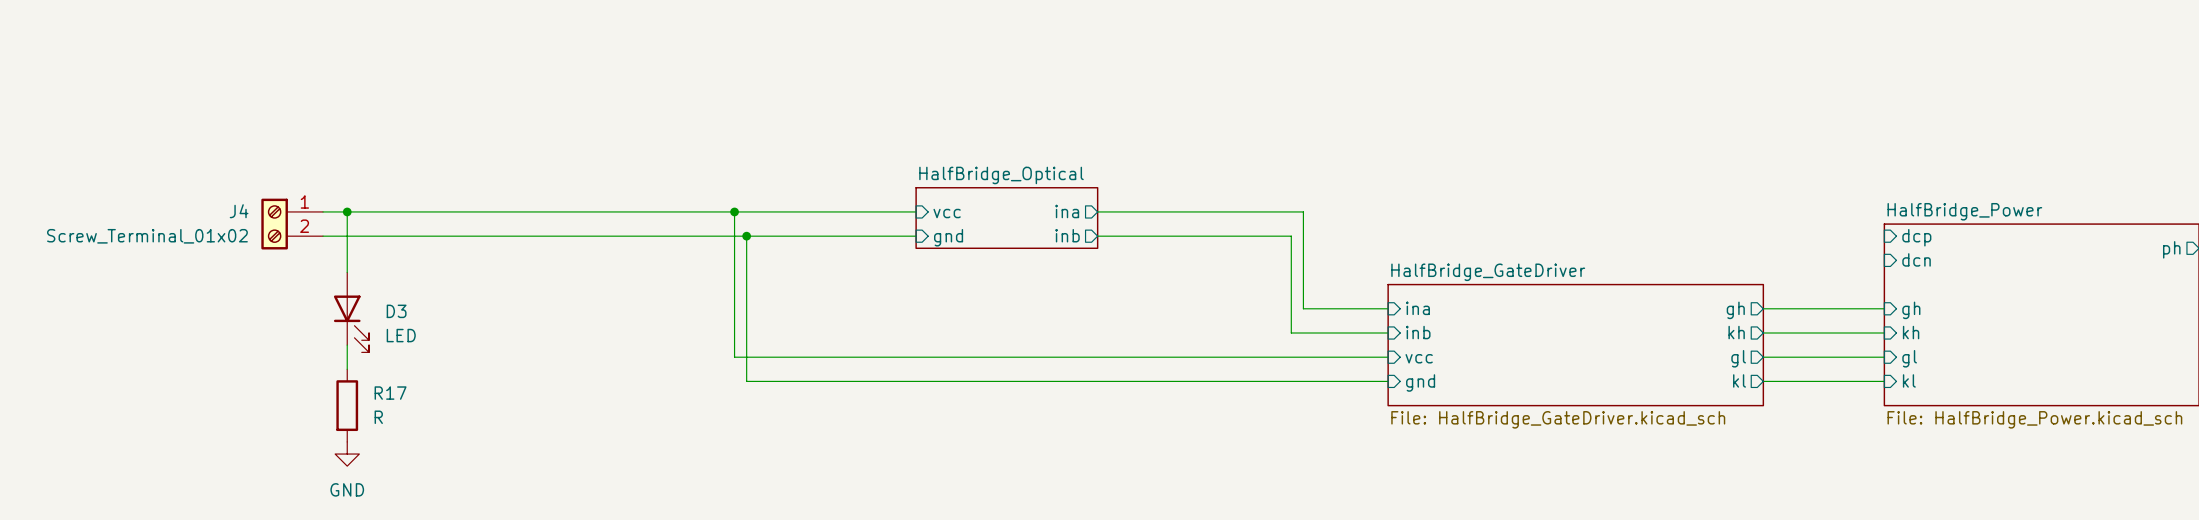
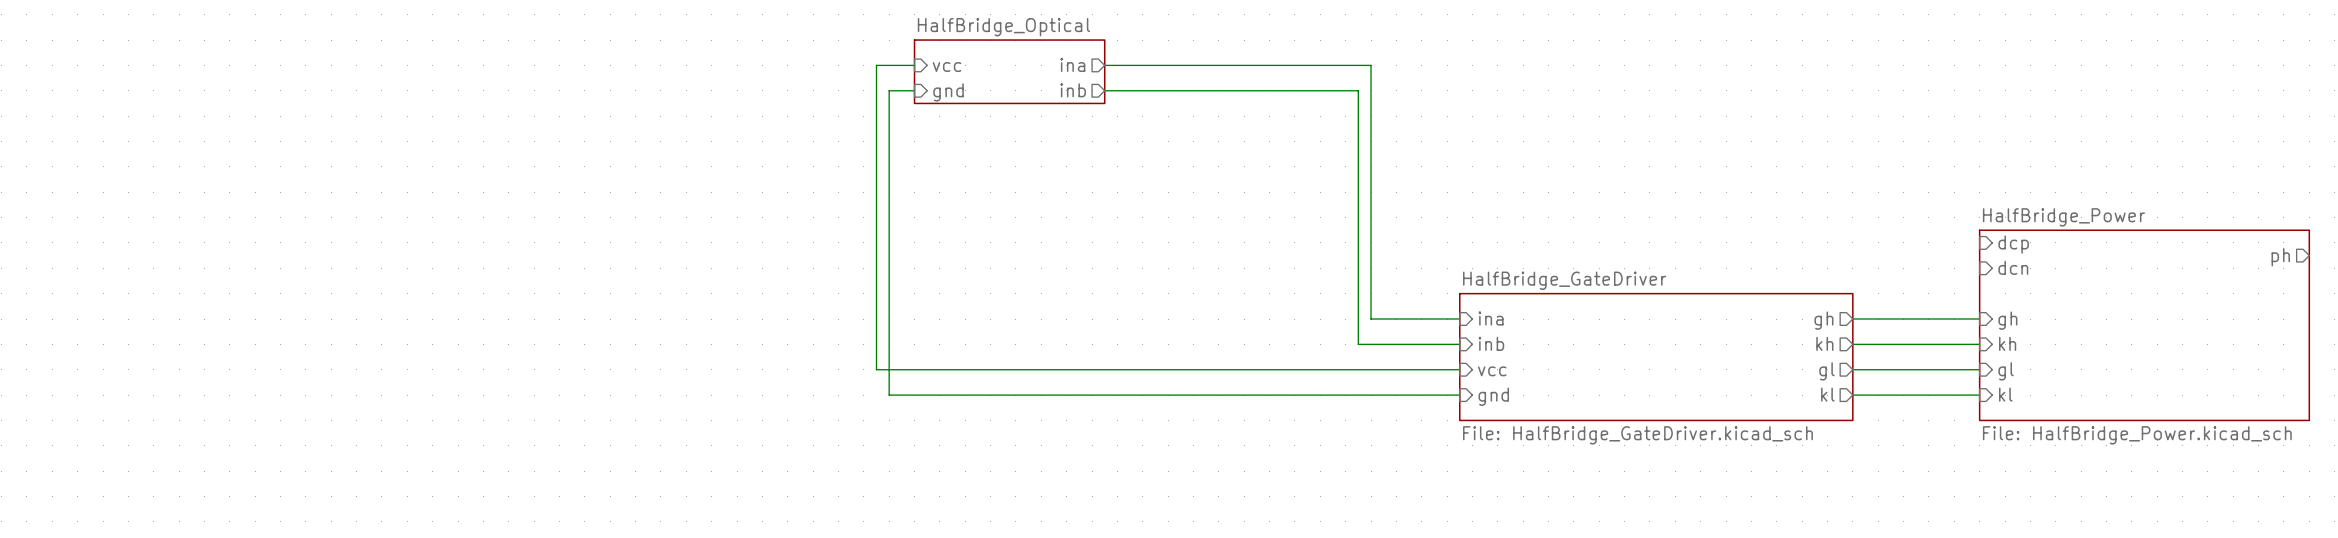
wire: (323, 211) (916, 211) -> none
wire: (347, 211) (347, 272) -> none
junction: (347, 211) -> none
wire: (734, 211) (734, 357) (831, 357) -> (914, 65) (876, 65) (876, 369)
junction: (734, 211) -> none
sheet pin position: ina (1067, 211) -> ina (1072, 64)
wire: (1097, 211) (1303, 211) -> (1104, 65) (1371, 65) (1371, 217)
sheet pin position: vcc (947, 213) -> vcc (947, 67)
sheet HalfBridge_Optical position: (1006, 218) -> (1009, 71)
J4: Screw_Terminal_01x02 (292, 224) -> none
sheet pin position: inb (1067, 235) -> inb (1073, 90)
wire: (323, 236) (916, 236) -> none
wire: (746, 236) (746, 381) (843, 381) -> (914, 90) (889, 90) (889, 395)
junction: (746, 236) -> none
wire: (1097, 236) (1291, 236) -> (1104, 90) (1358, 90) (1358, 242)
sheet pin position: gnd (948, 237) -> gnd (948, 92)
D3: LED (351, 312) -> none
wire: (347, 345) (347, 369) -> none
R17: R (347, 405) -> none
power symbol: GND (347, 454) -> none

